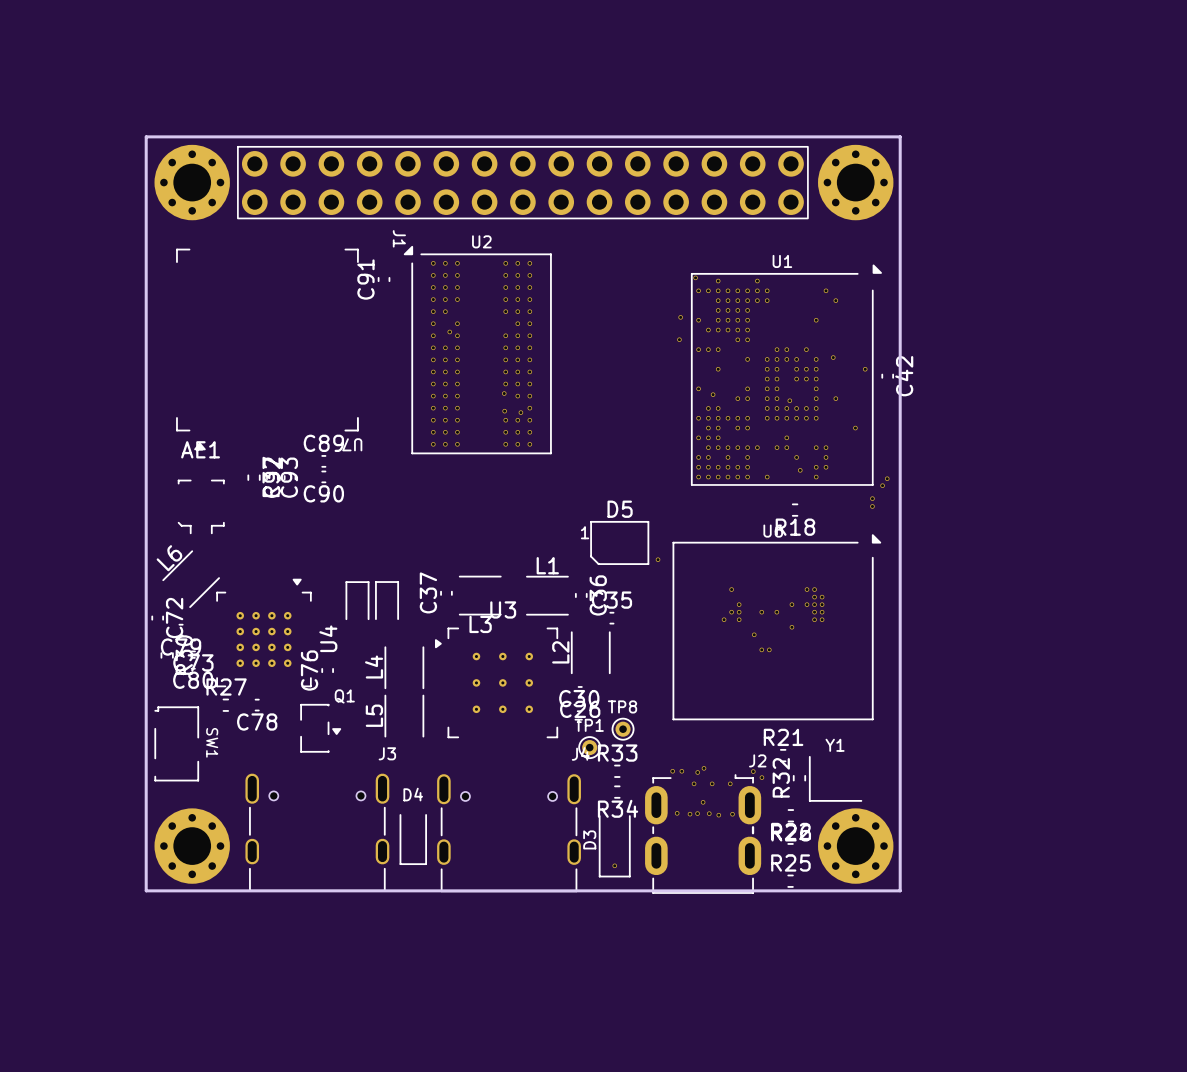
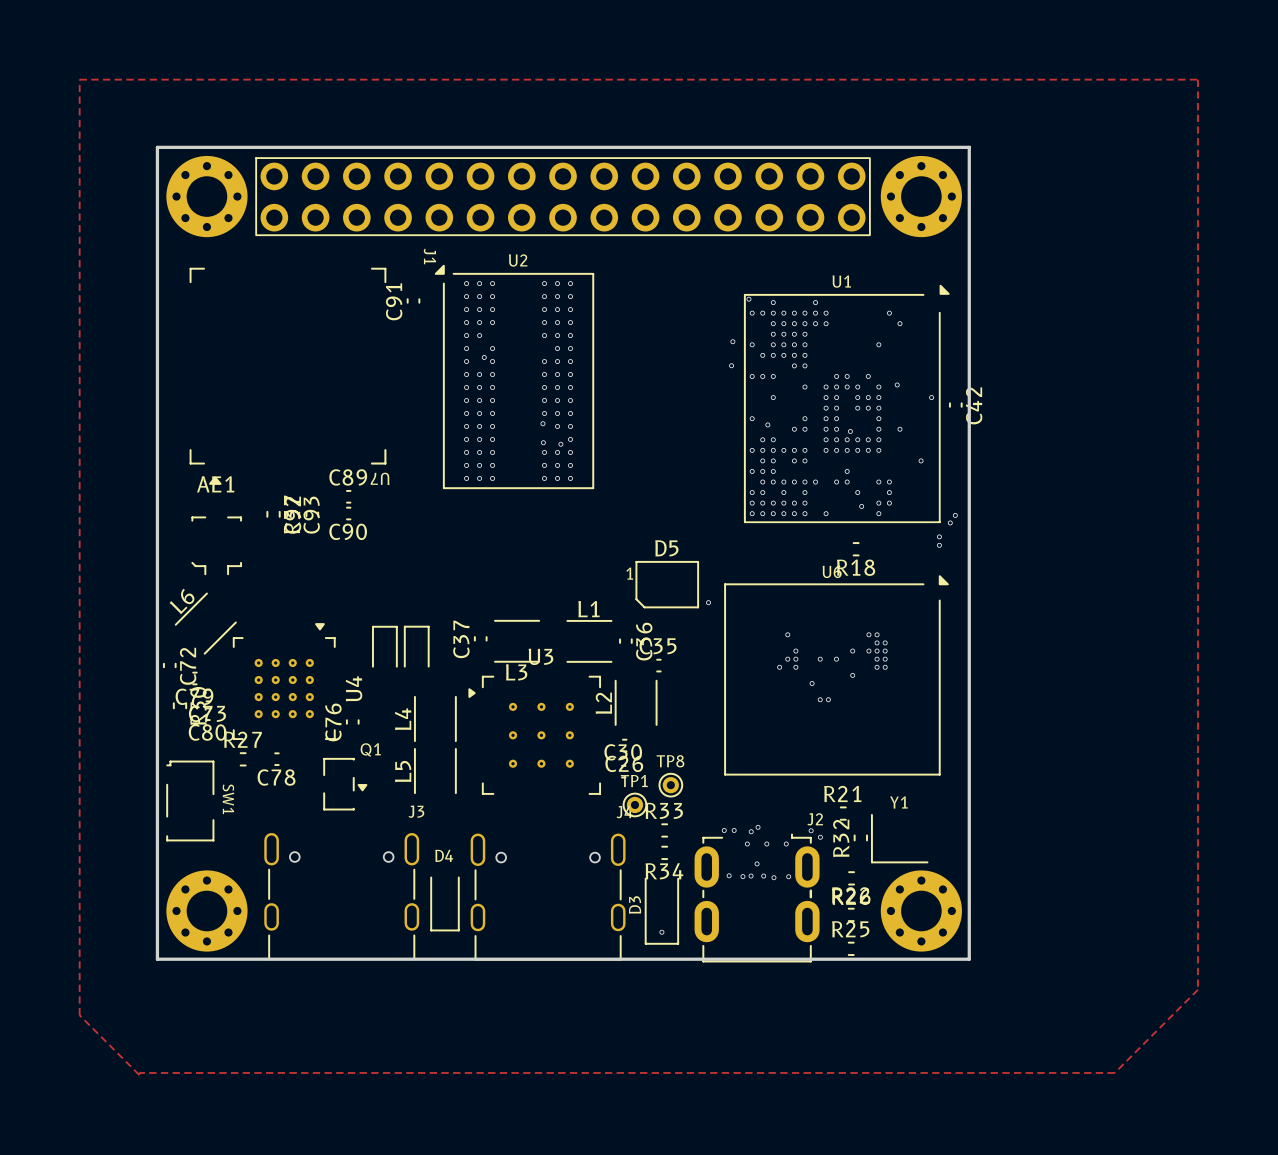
zone outline: none -> (79, 79) (1197, 79) (1197, 989) (1114, 1072) (139, 1072) (139, 1074) (79, 1015) (79, 79)

